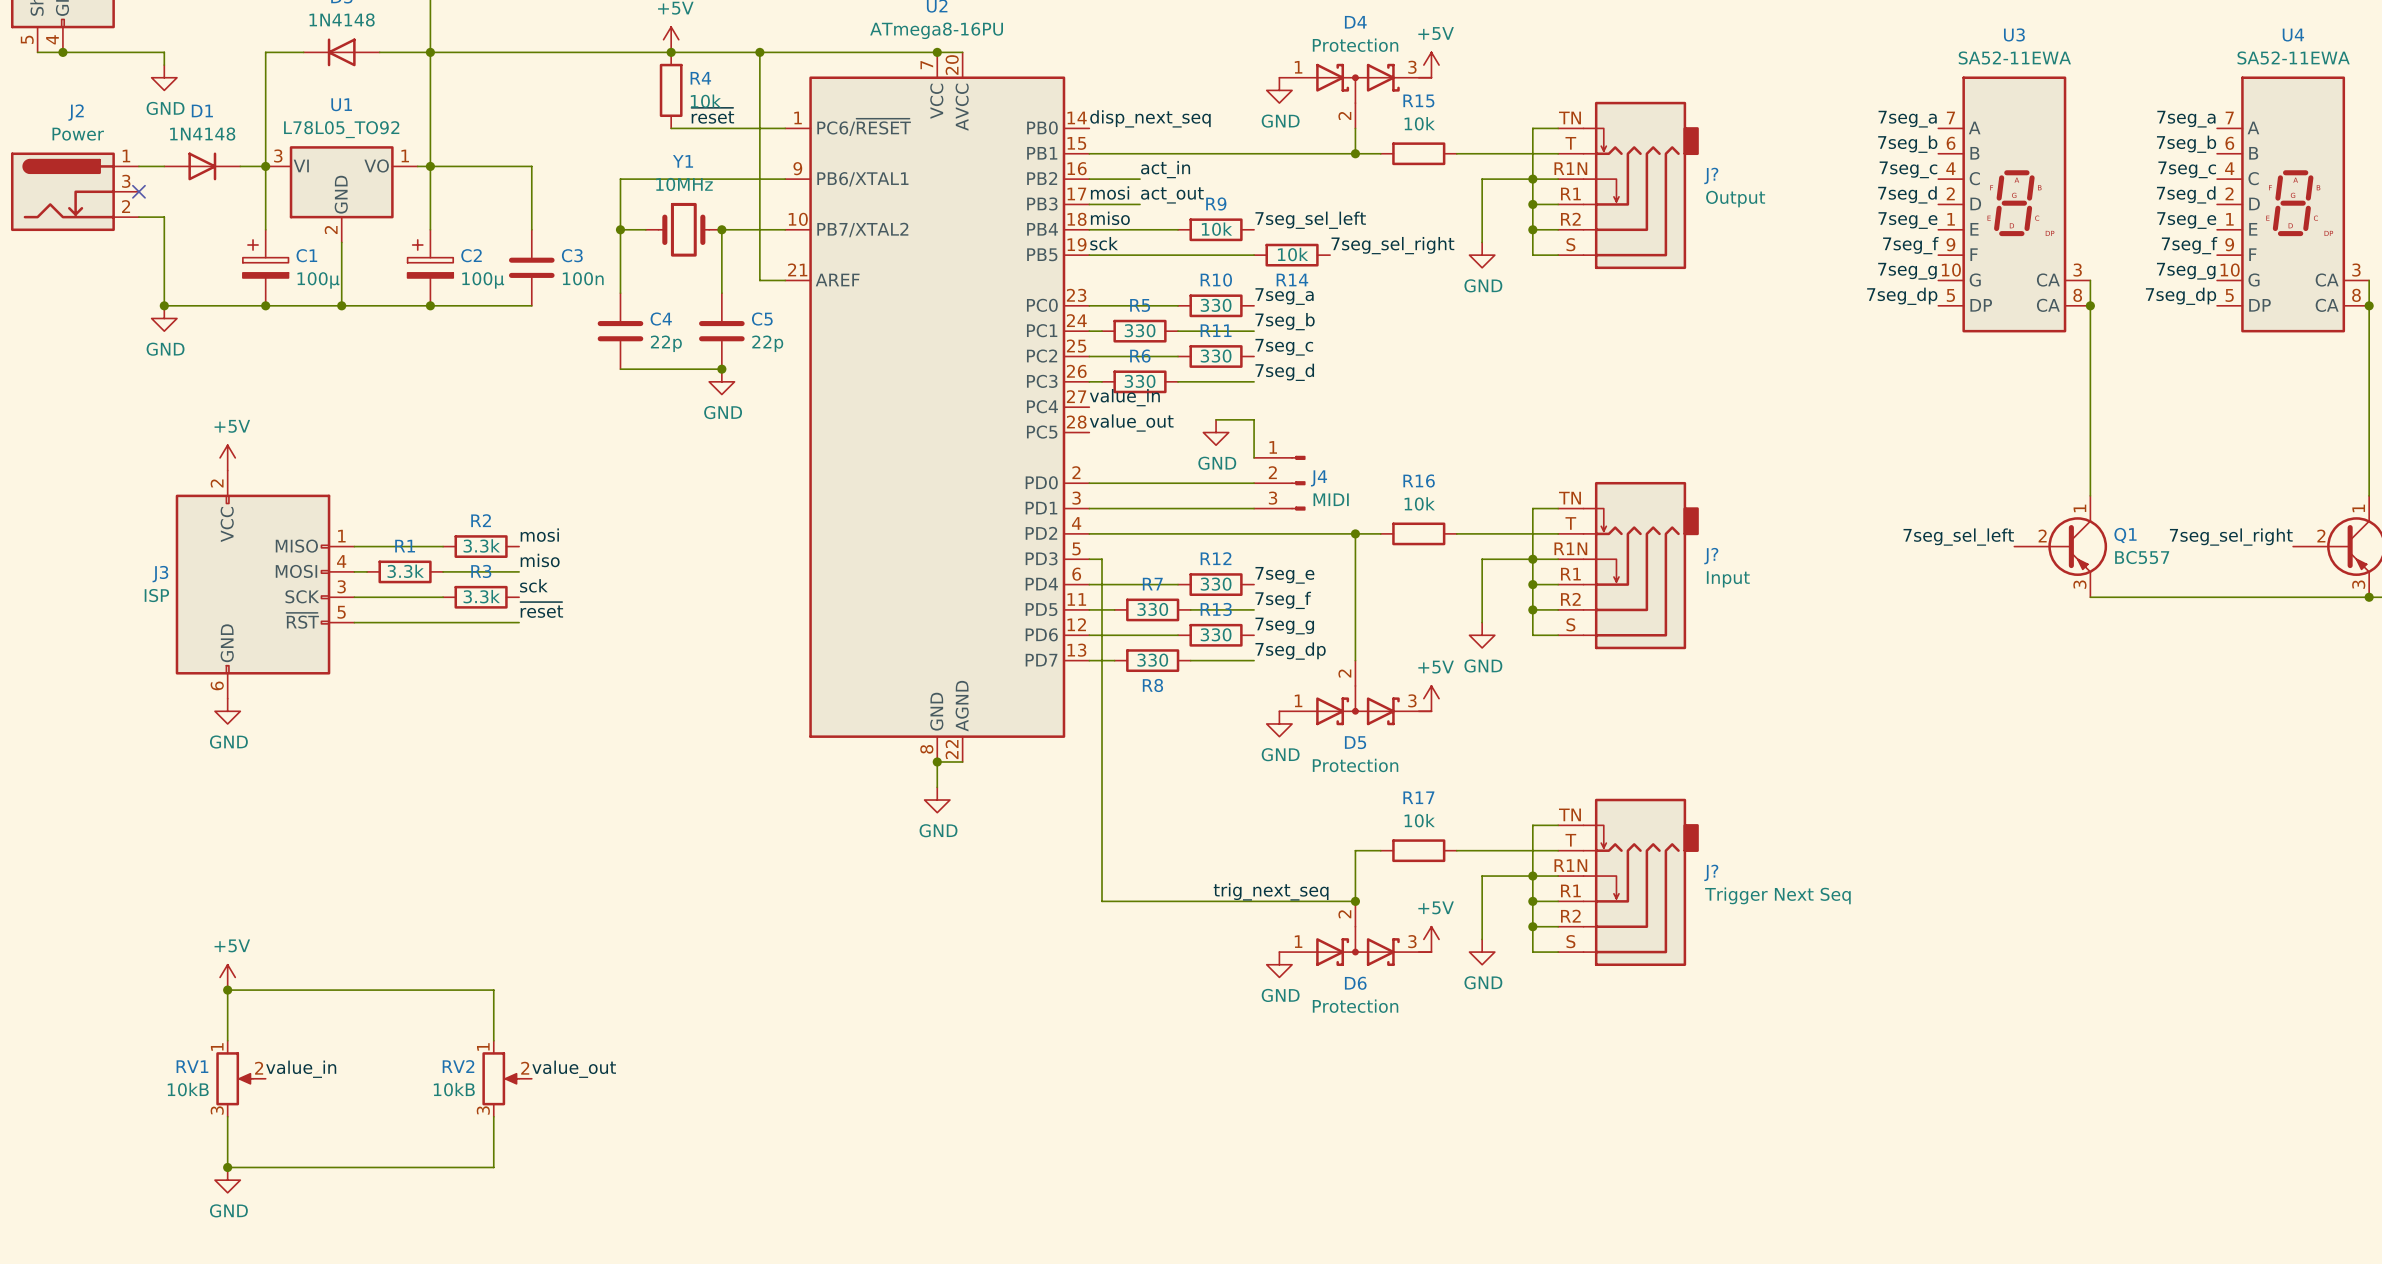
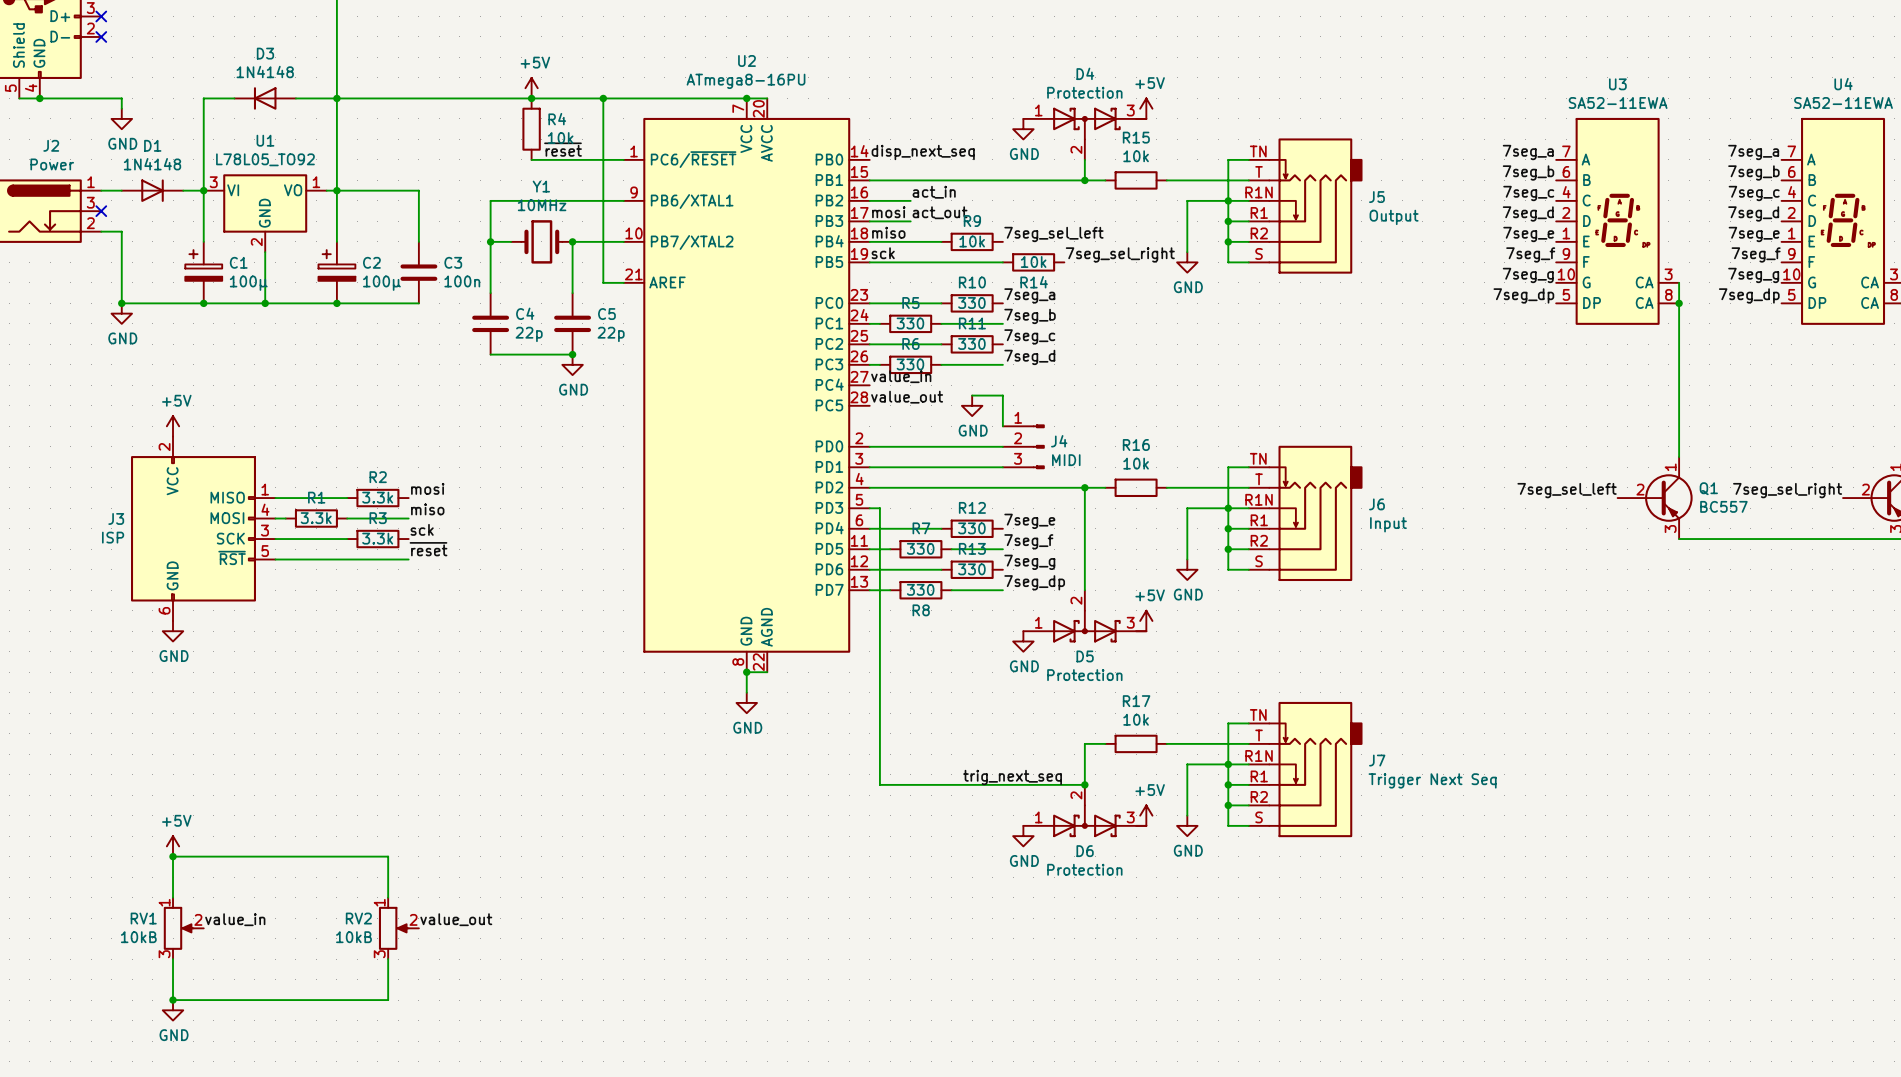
J? name: J? (1711, 175) -> J5 (1376, 197)
J? name: J? (1711, 556) -> J6 (1376, 504)
J? name: J? (1711, 872) -> J7 (1377, 760)

